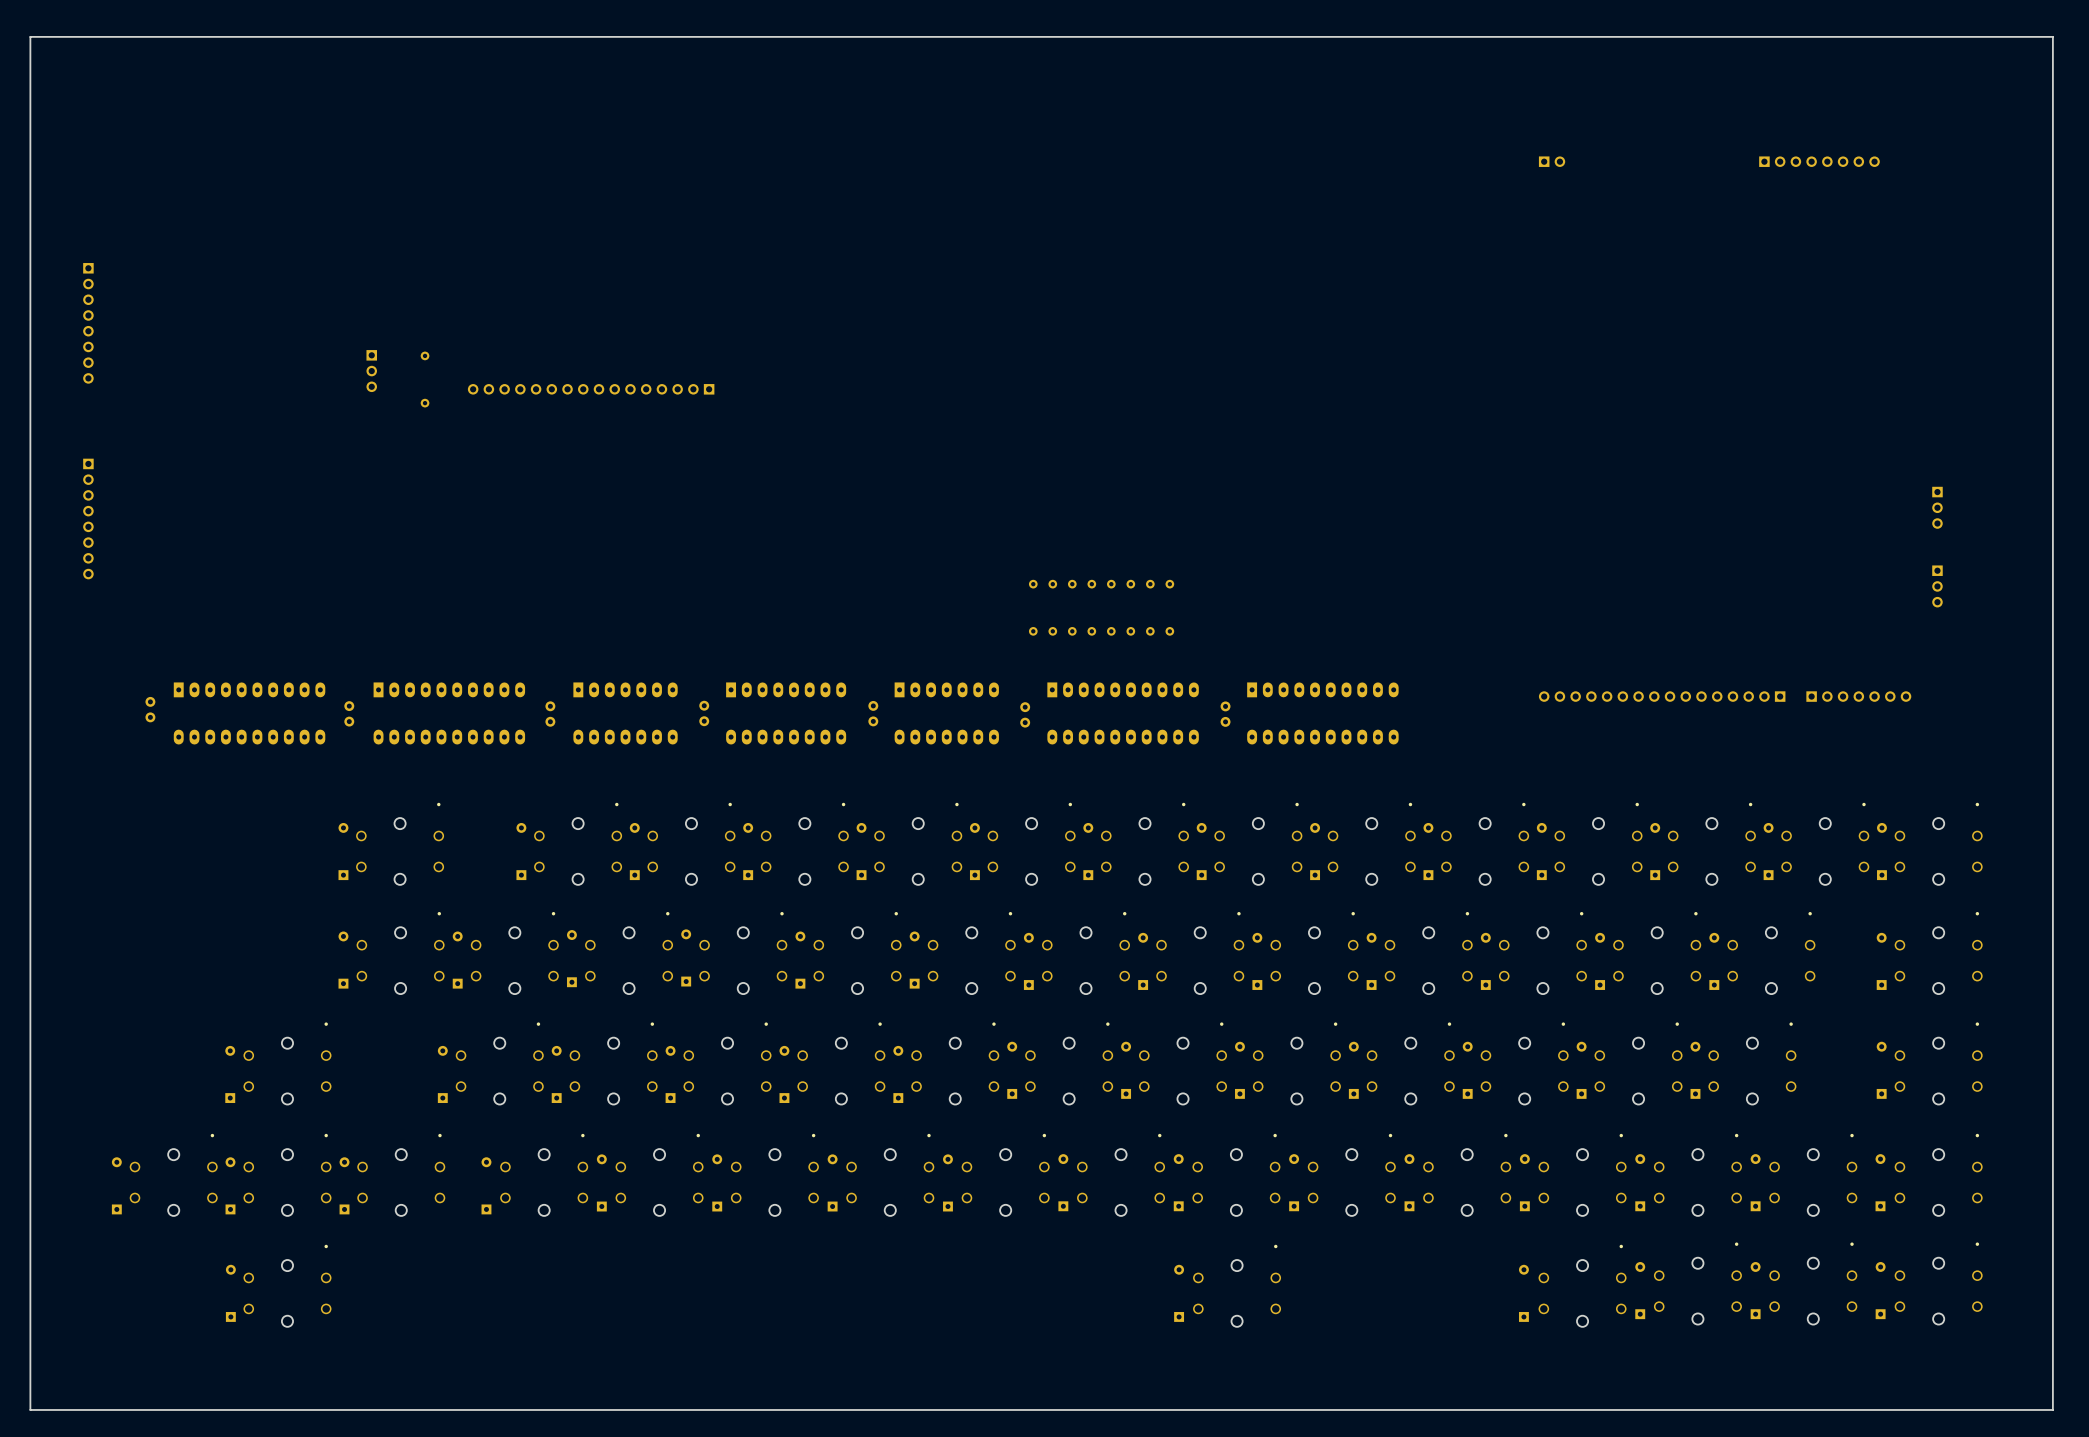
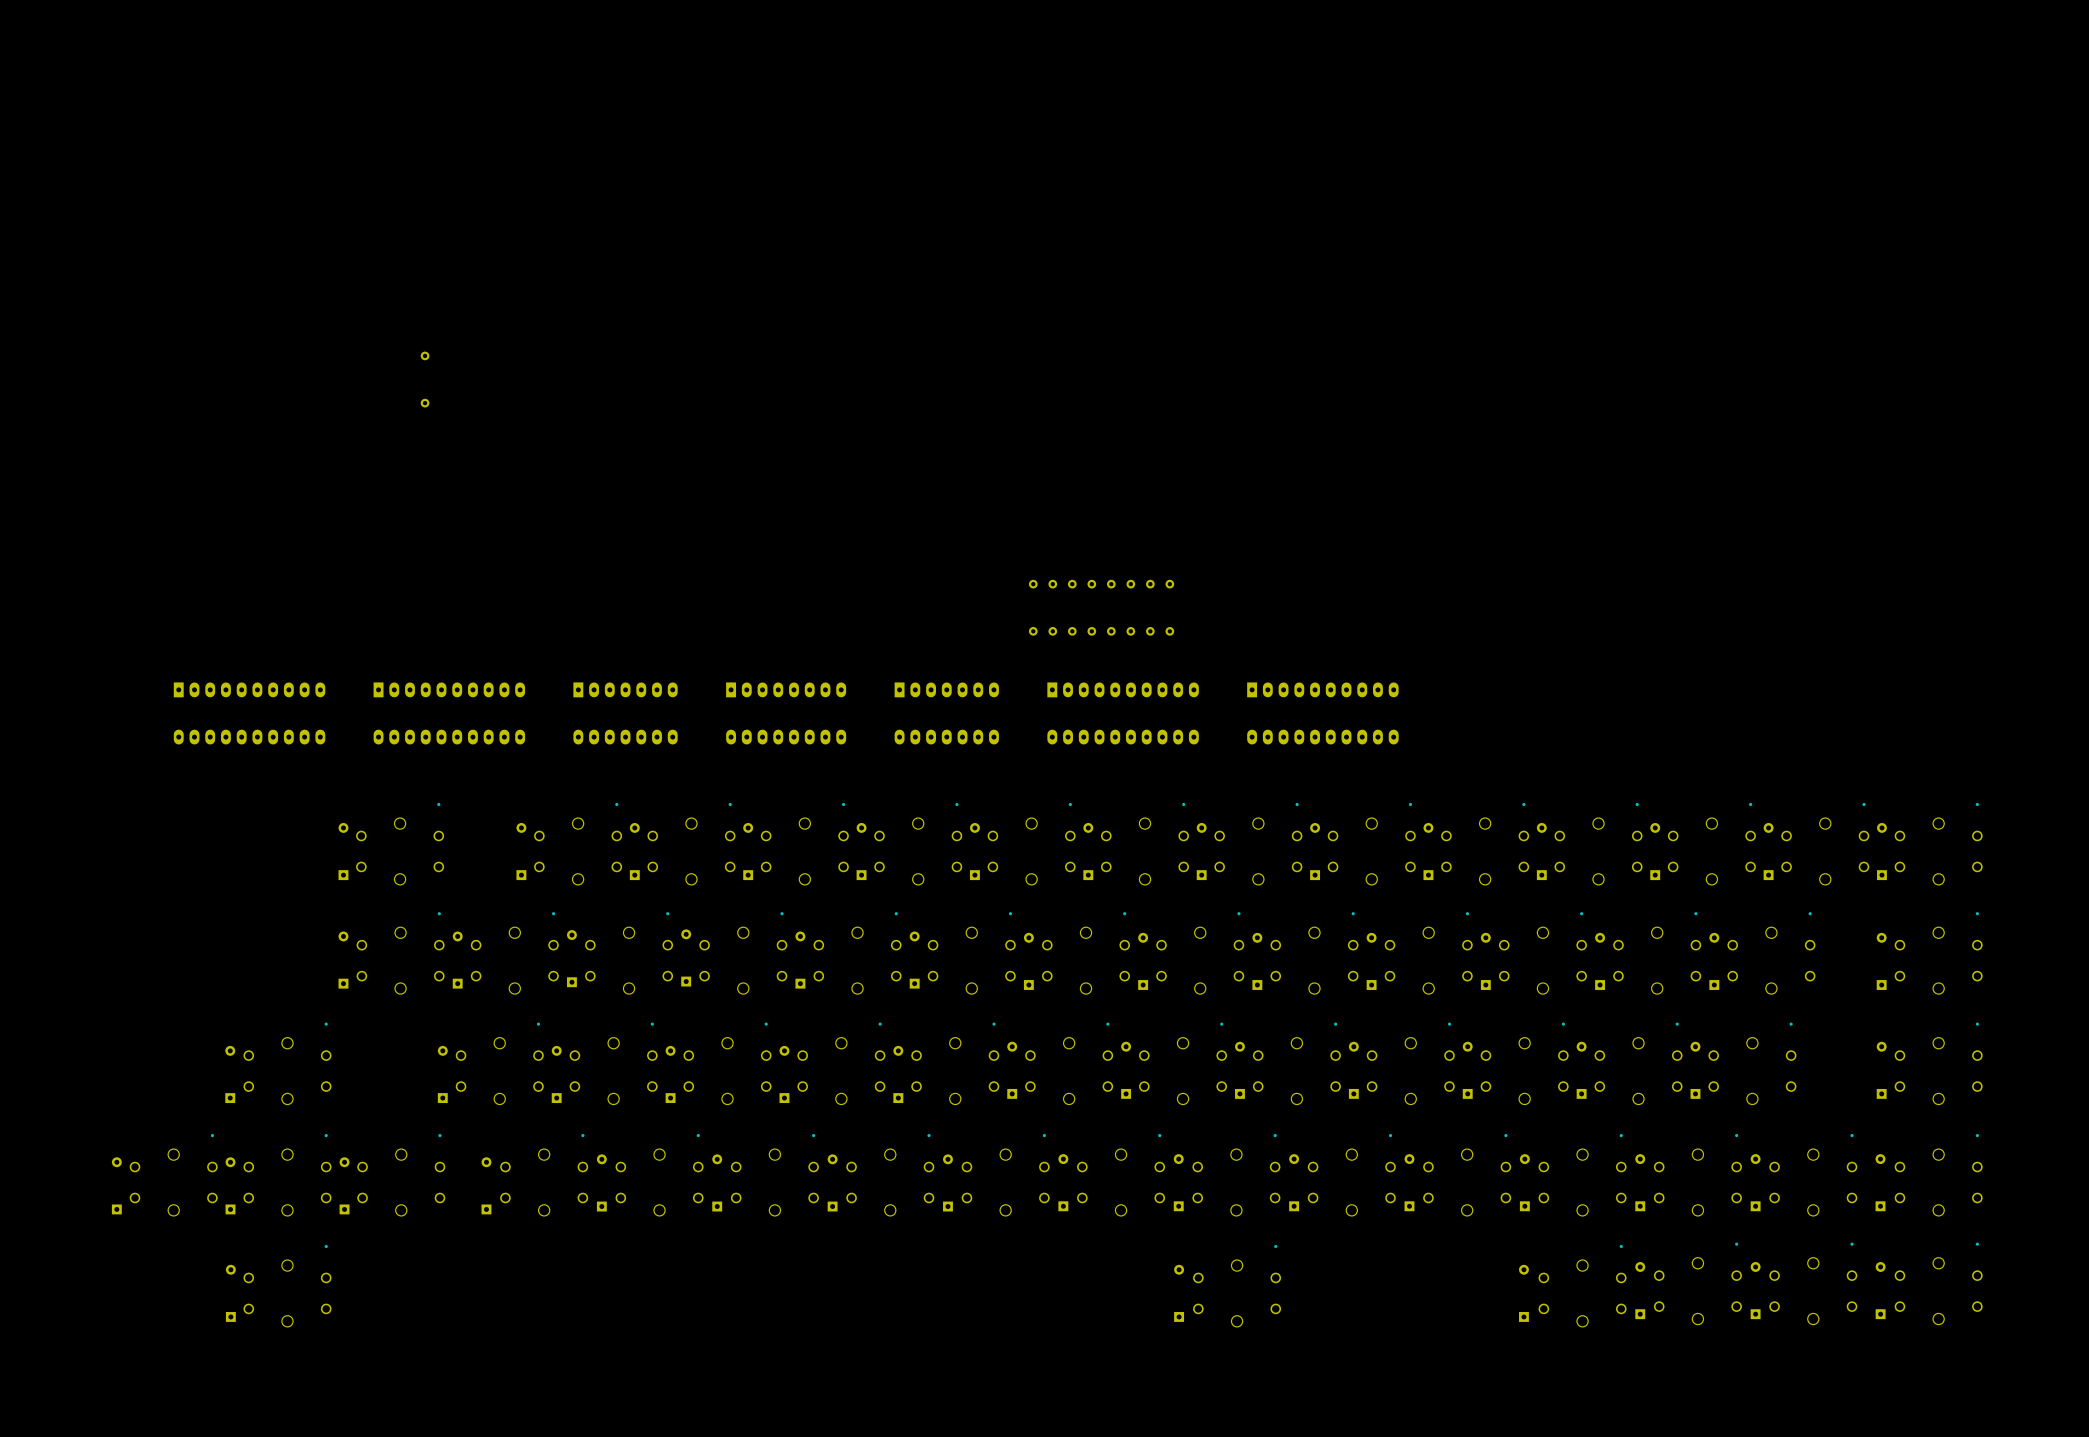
board edge: (2052, 36) (30, 36) (30, 1409) (2052, 1409) (2052, 36) -> none
part: (1552, 161) -> none
part: (1819, 161) -> none
part: (88, 323) -> none
part: (371, 371) -> none
part: (591, 389) -> none
part: (1937, 507) -> none
part: (88, 518) -> none
part: (1937, 586) -> none
part: (1662, 696) -> none
part: (1858, 696) -> none
part: (150, 709) -> none
part: (349, 713) -> none
part: (704, 713) -> none
part: (873, 713) -> none
part: (550, 714) -> none
part: (1025, 714) -> none
part: (1225, 714) -> none

